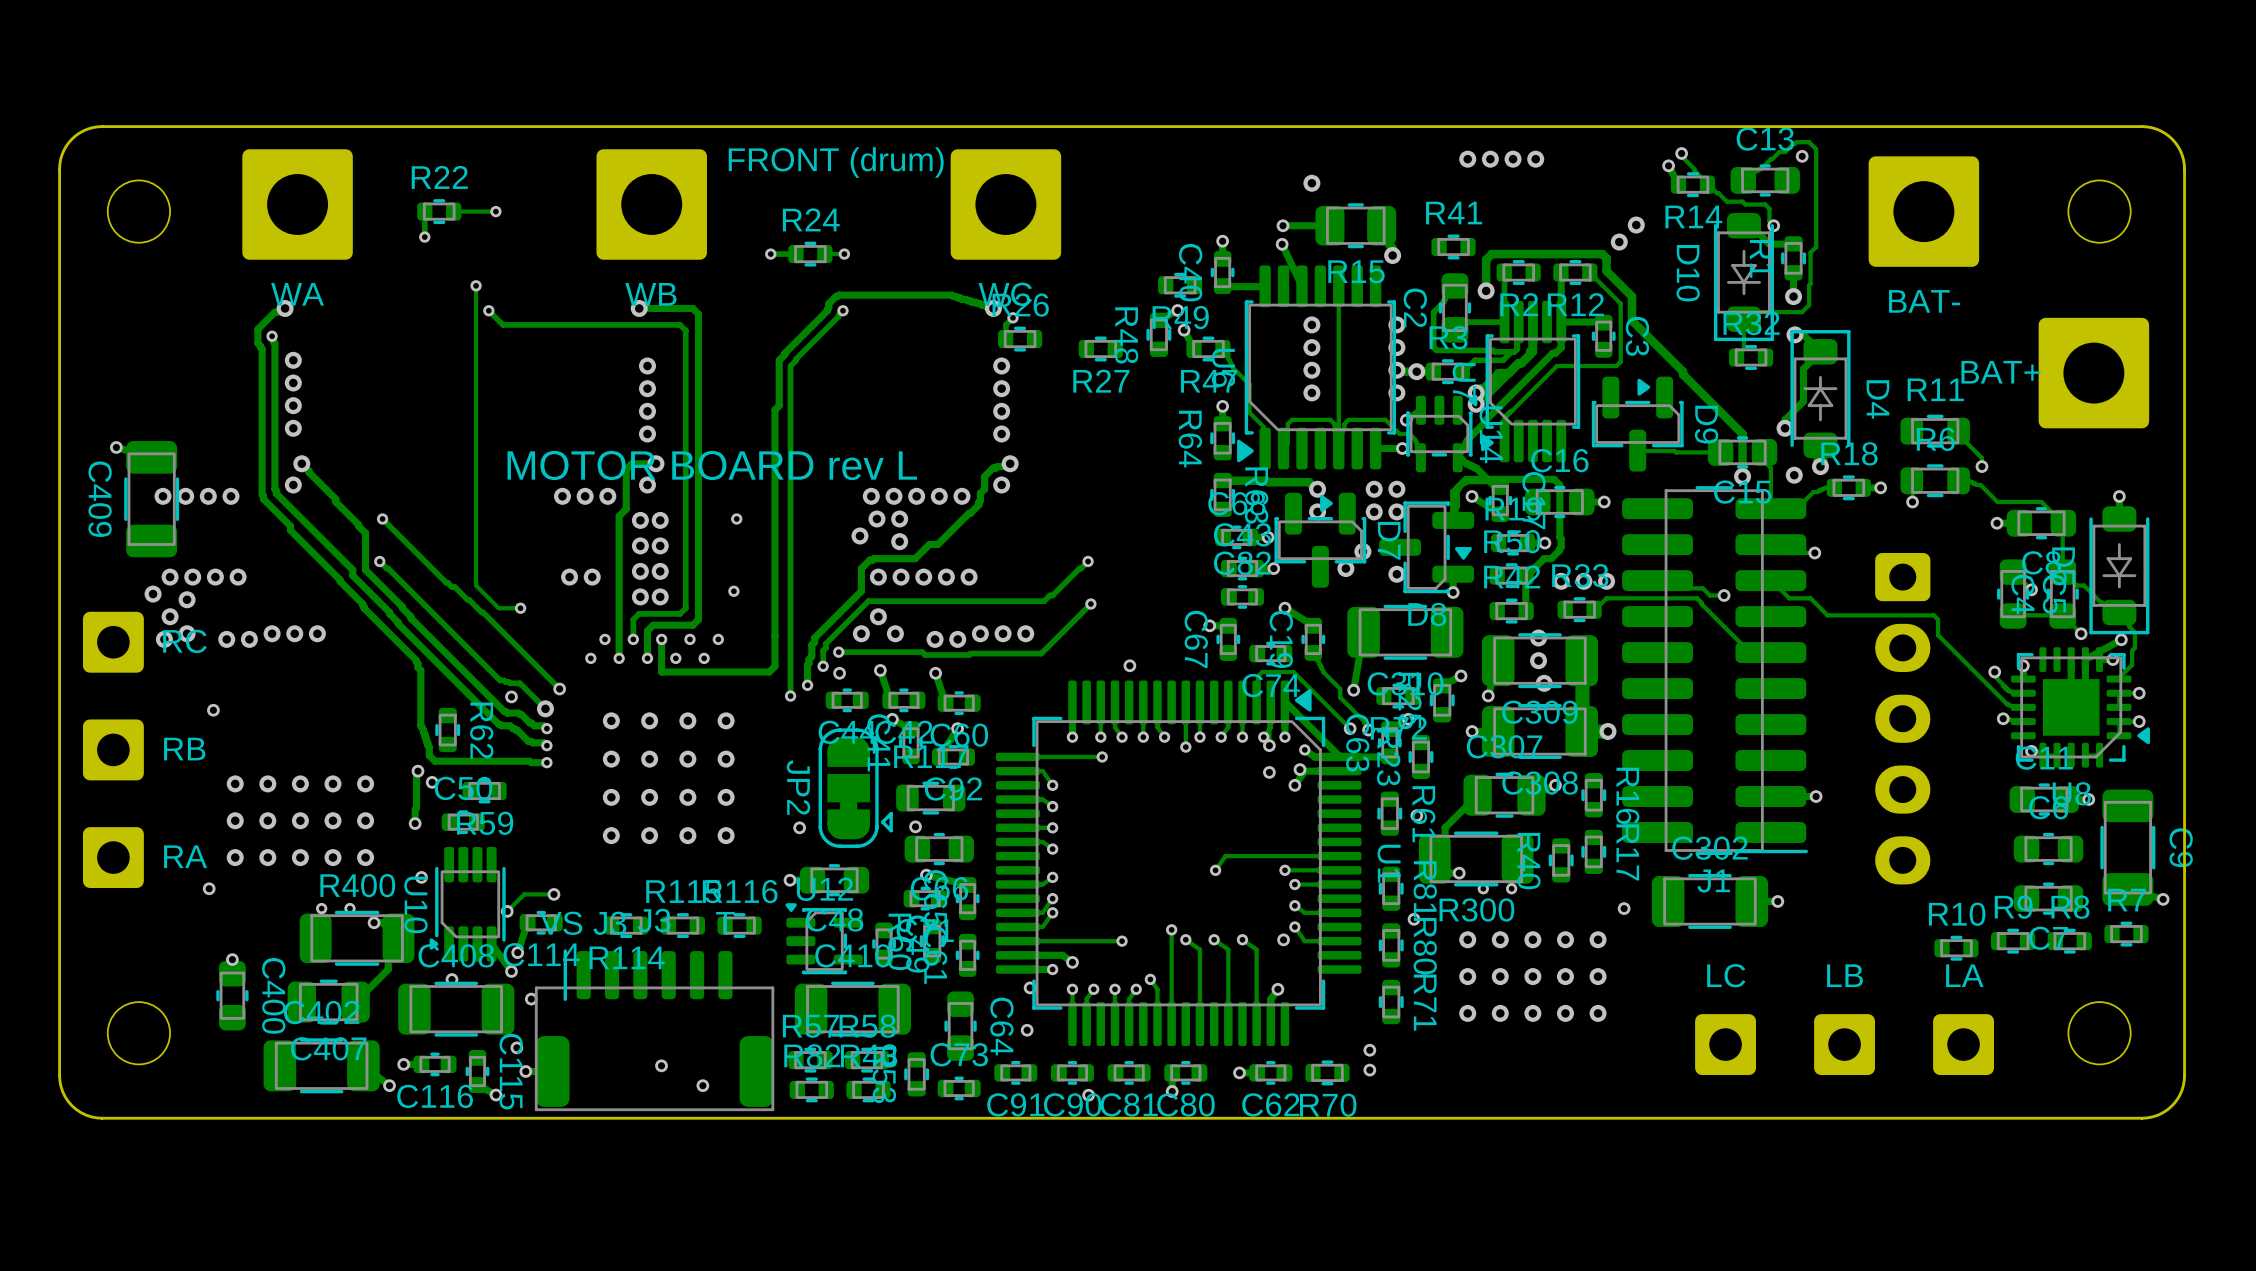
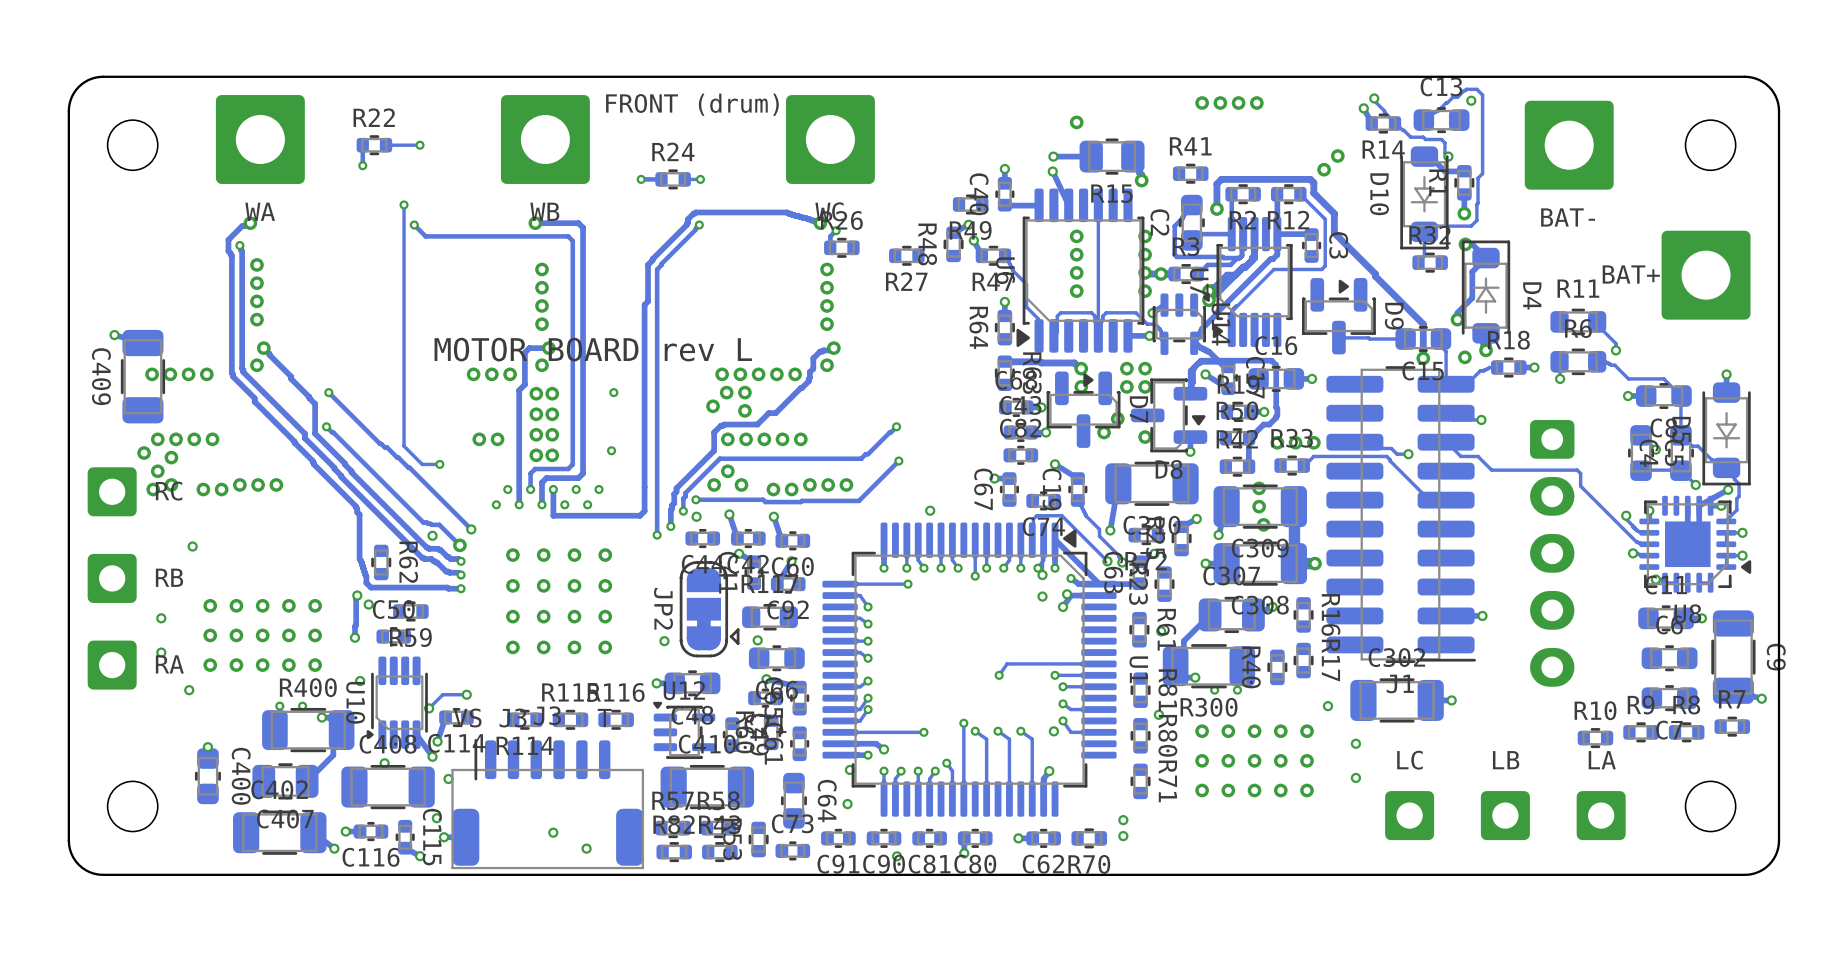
via: none -> (161, 618)
via: none -> (161, 652)
via: none -> (1355, 743)
via: none -> (1355, 777)

